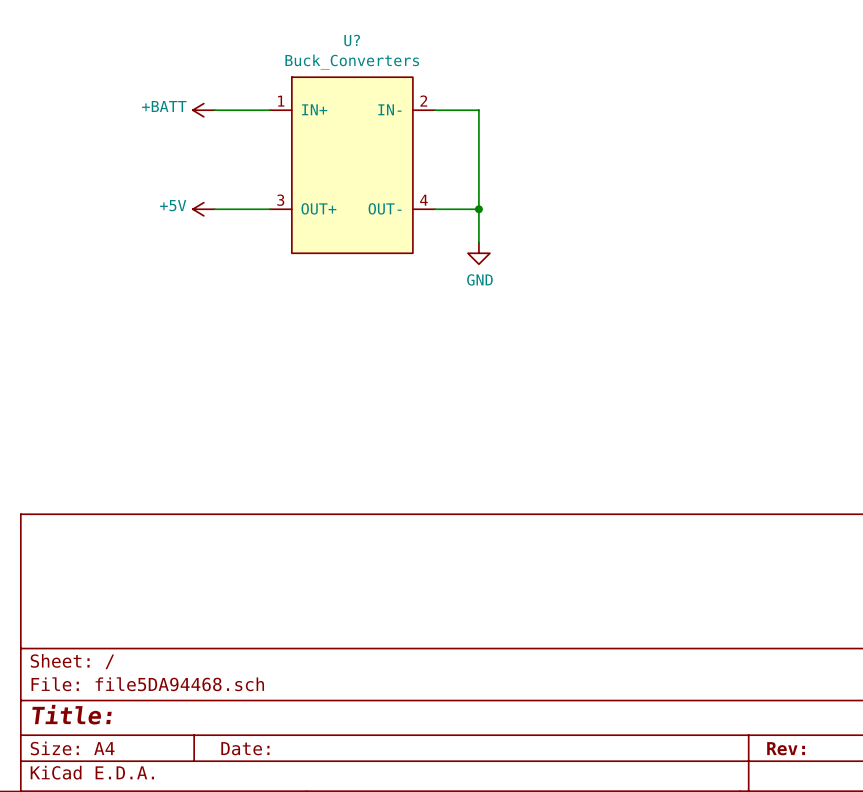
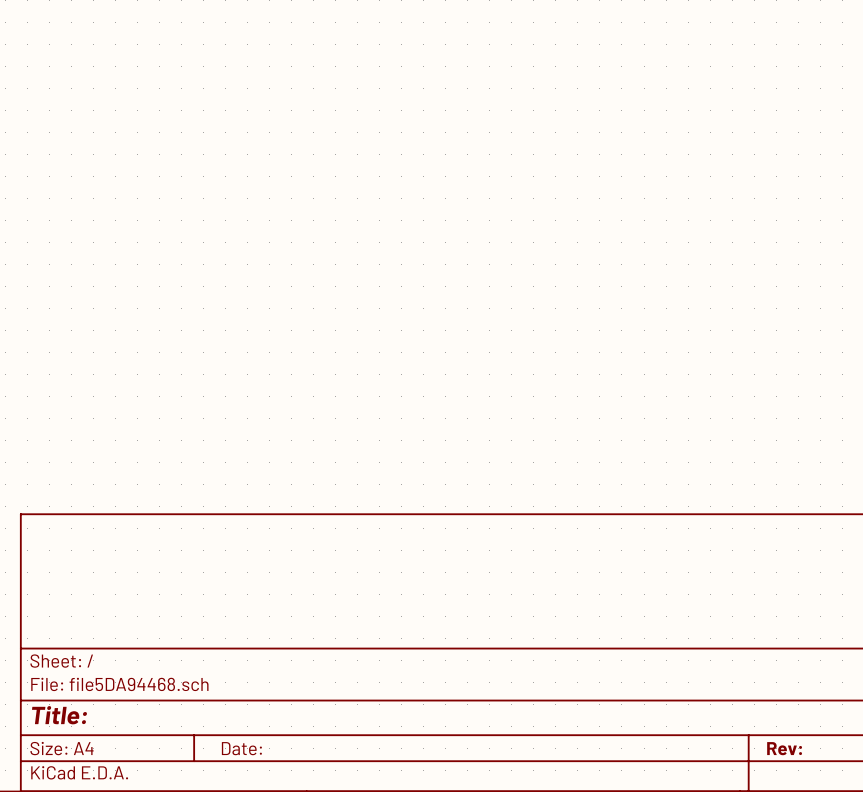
power symbol: +BATT (203, 110) -> none
wire: (214, 110) (269, 110) -> none
wire: (434, 110) (478, 110) (478, 242) -> none
U?: Buck_Converters (352, 165) -> none
power symbol: +5V (203, 209) -> none
wire: (214, 209) (269, 209) -> none
wire: (434, 209) (478, 209) -> none
junction: (478, 209) -> none
power symbol: GND (478, 253) -> none

